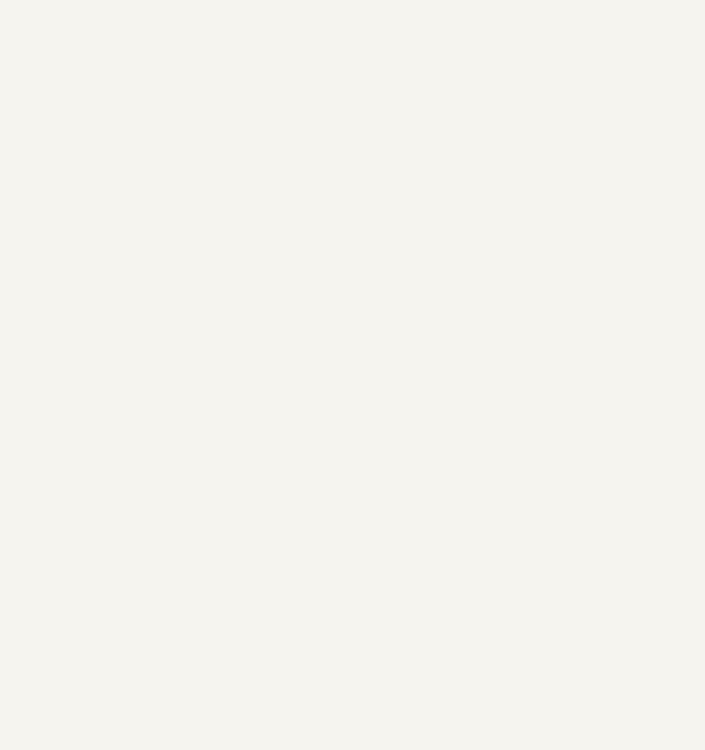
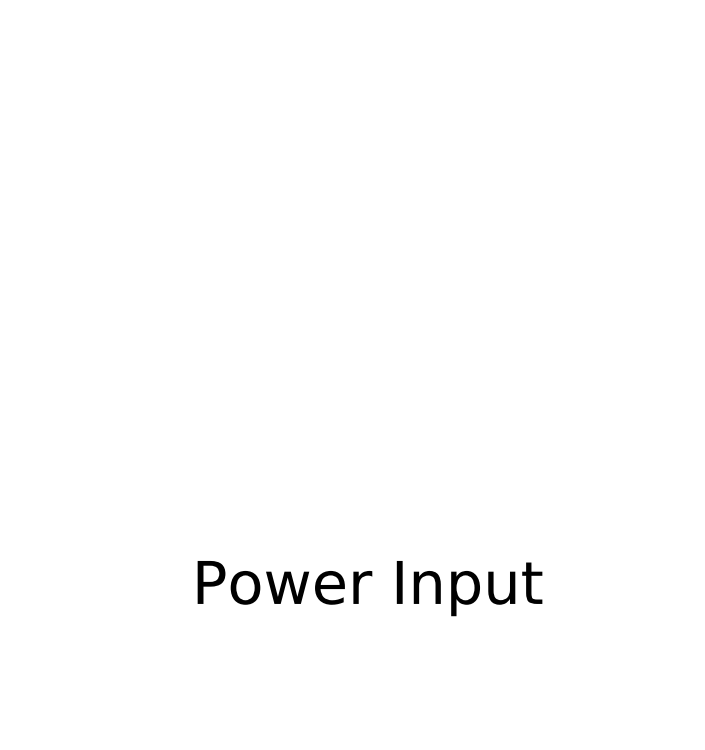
text: none -> Power Input (370, 588)

